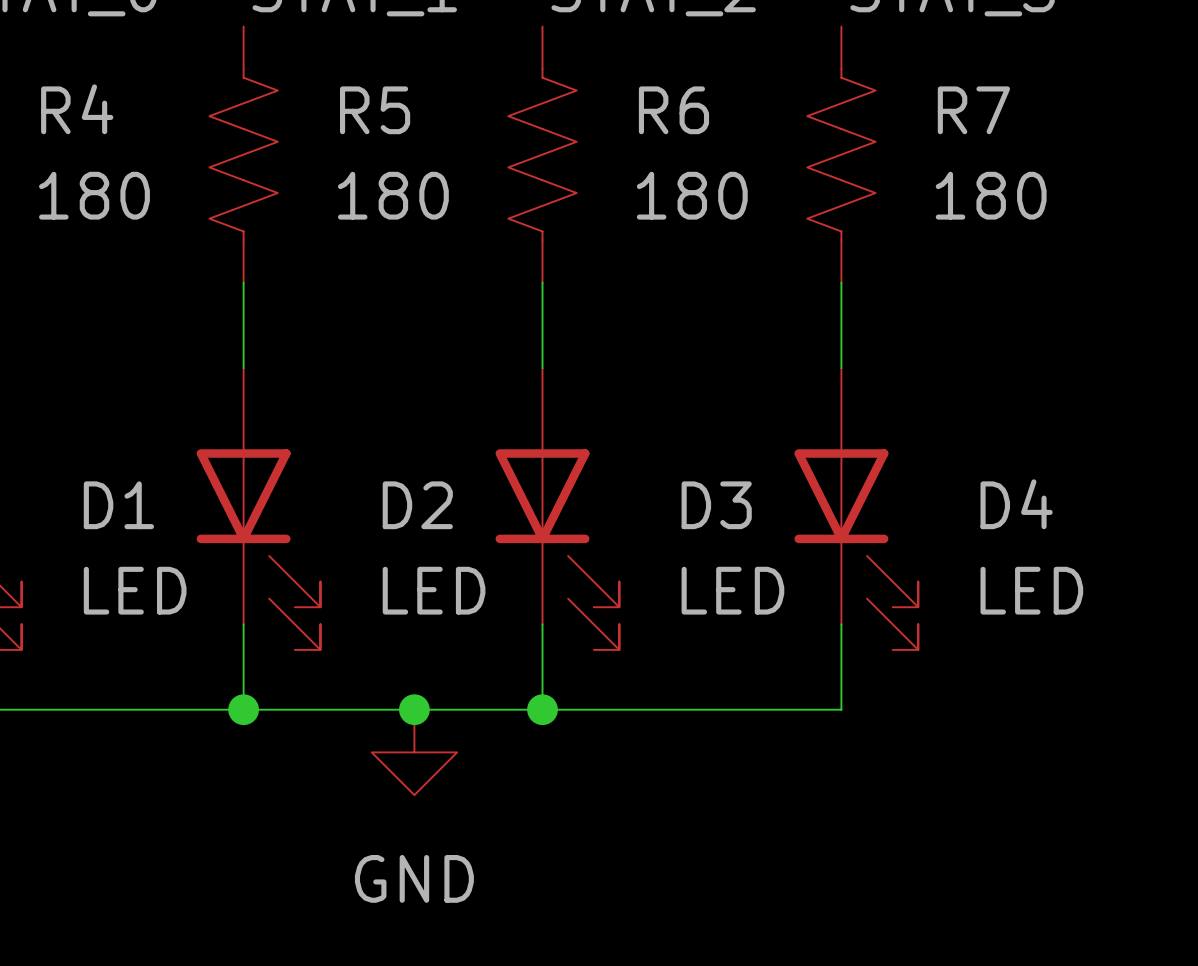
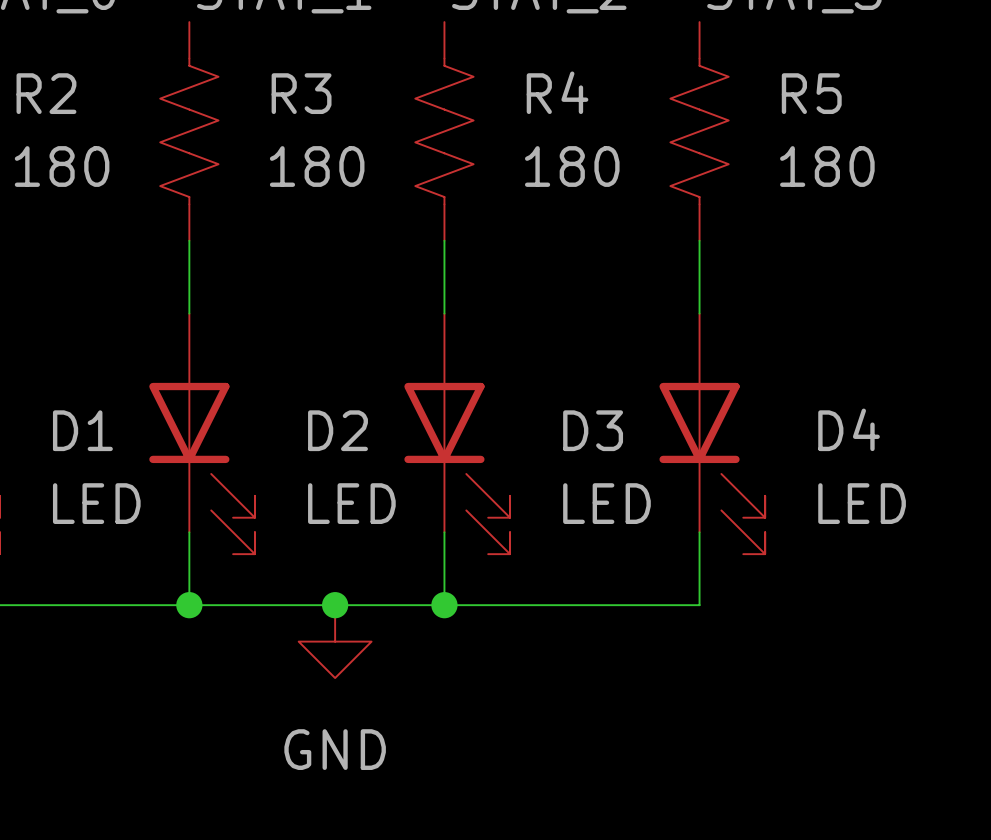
R4 name: R4 (77, 109) -> R2 (46, 93)
R5 name: R5 (375, 110) -> R3 (301, 93)
R6 name: R6 (673, 110) -> R4 (557, 92)
R7 name: R7 (973, 110) -> R5 (811, 93)

